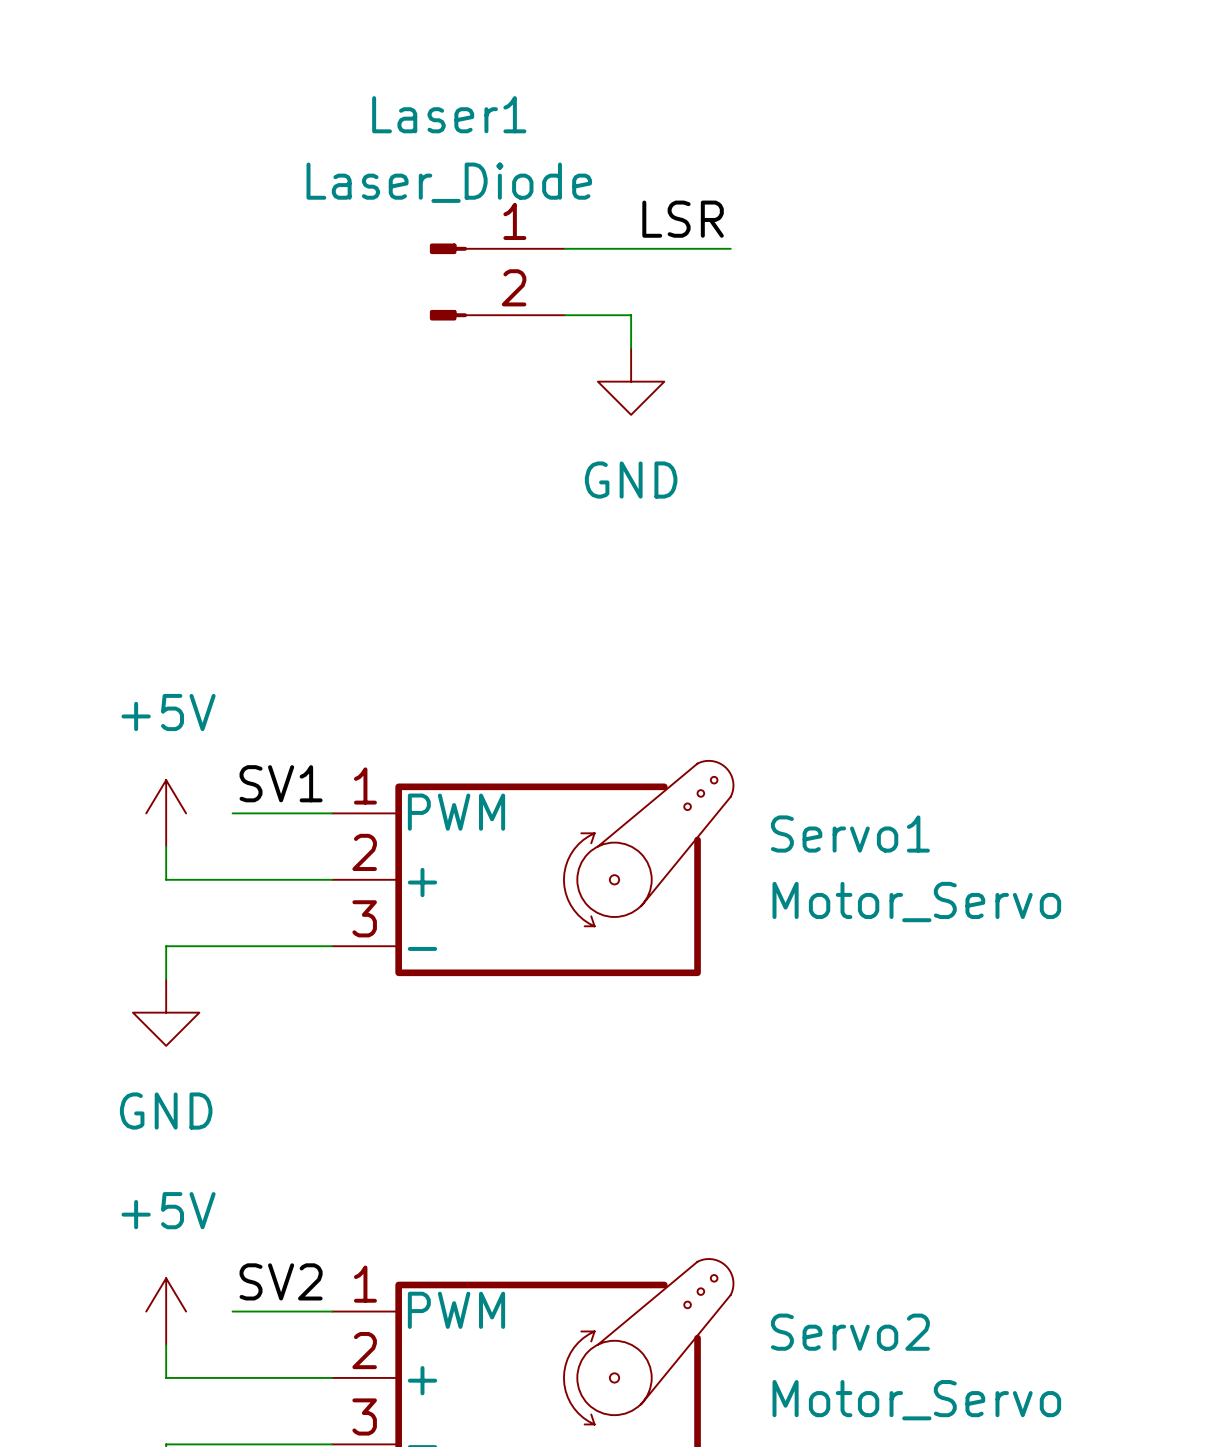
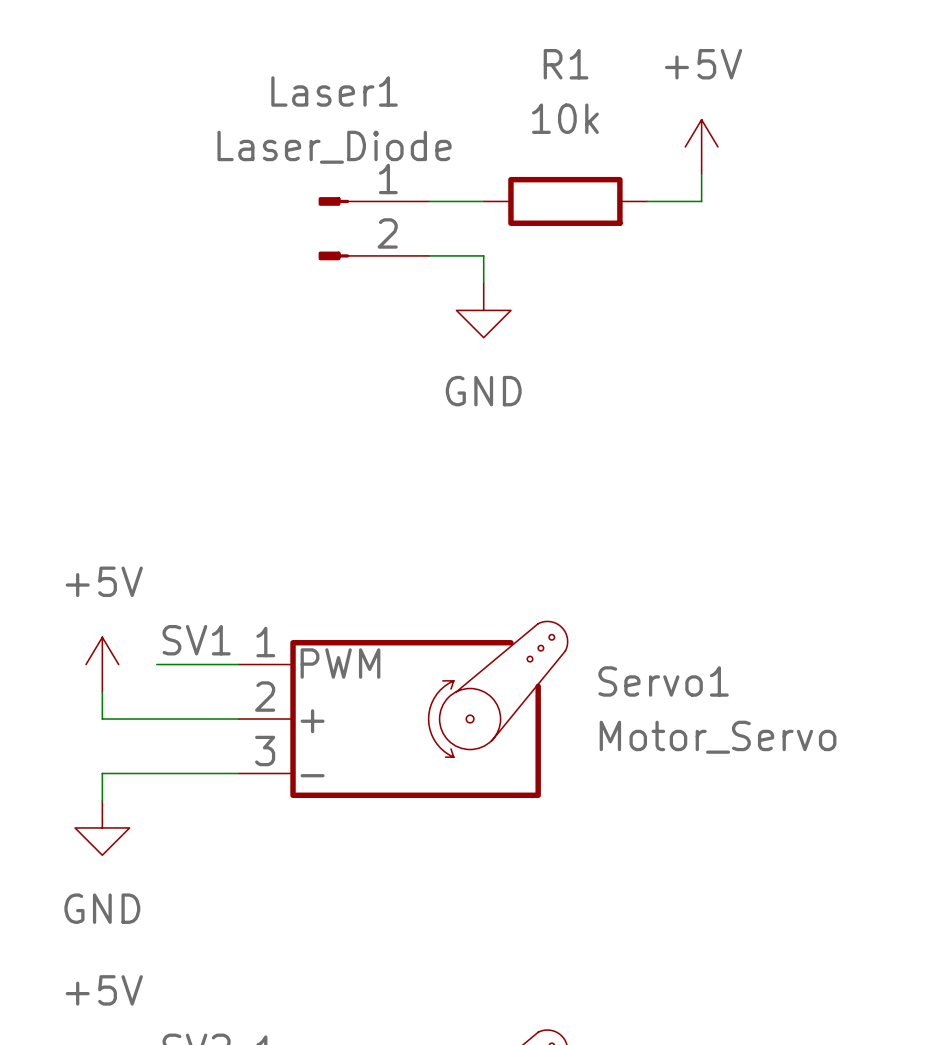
power symbol: none -> +5V (701, 146)
wire: none -> (701, 174) (701, 201) (647, 201)
label: LSR (683, 219) -> none
wire: (631, 248) (730, 248) -> none
R1: none -> 10k (565, 201)

